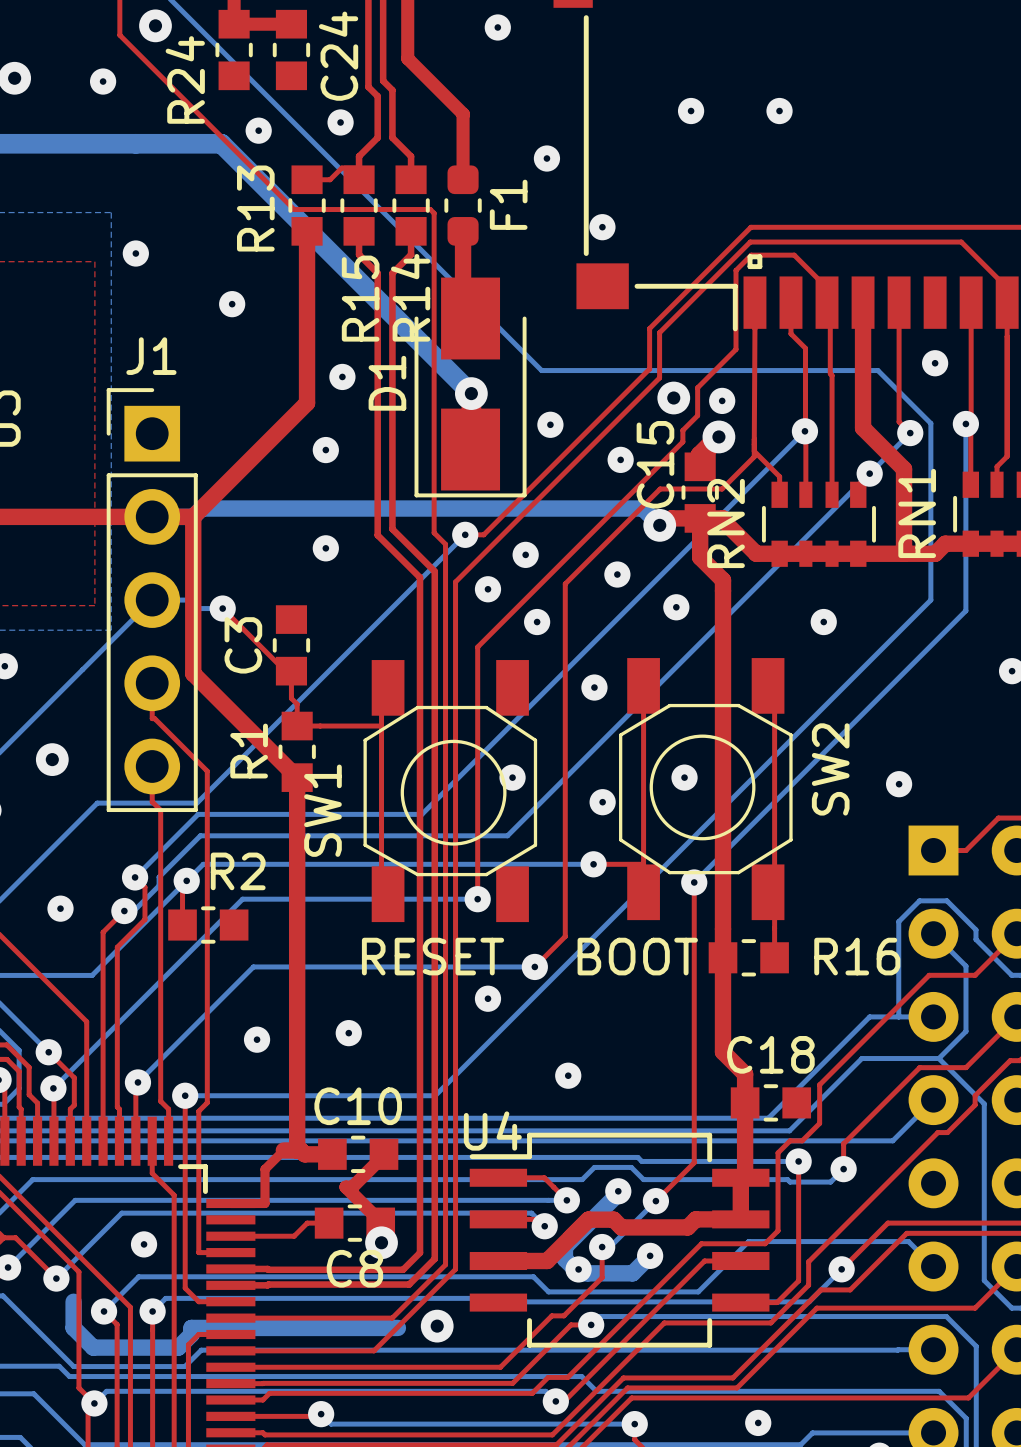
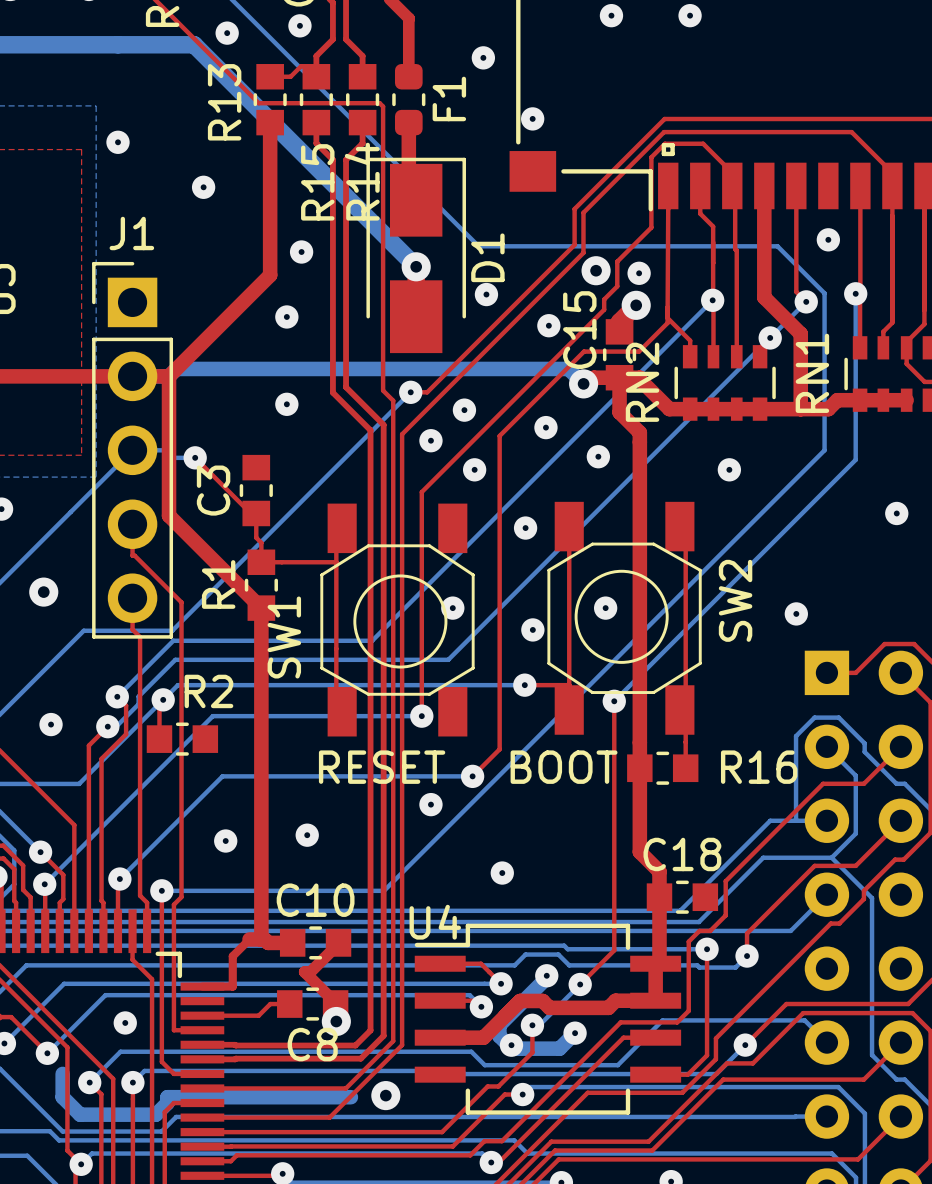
D1 rotation: 0° (470, 387) -> 180° (416, 255)

